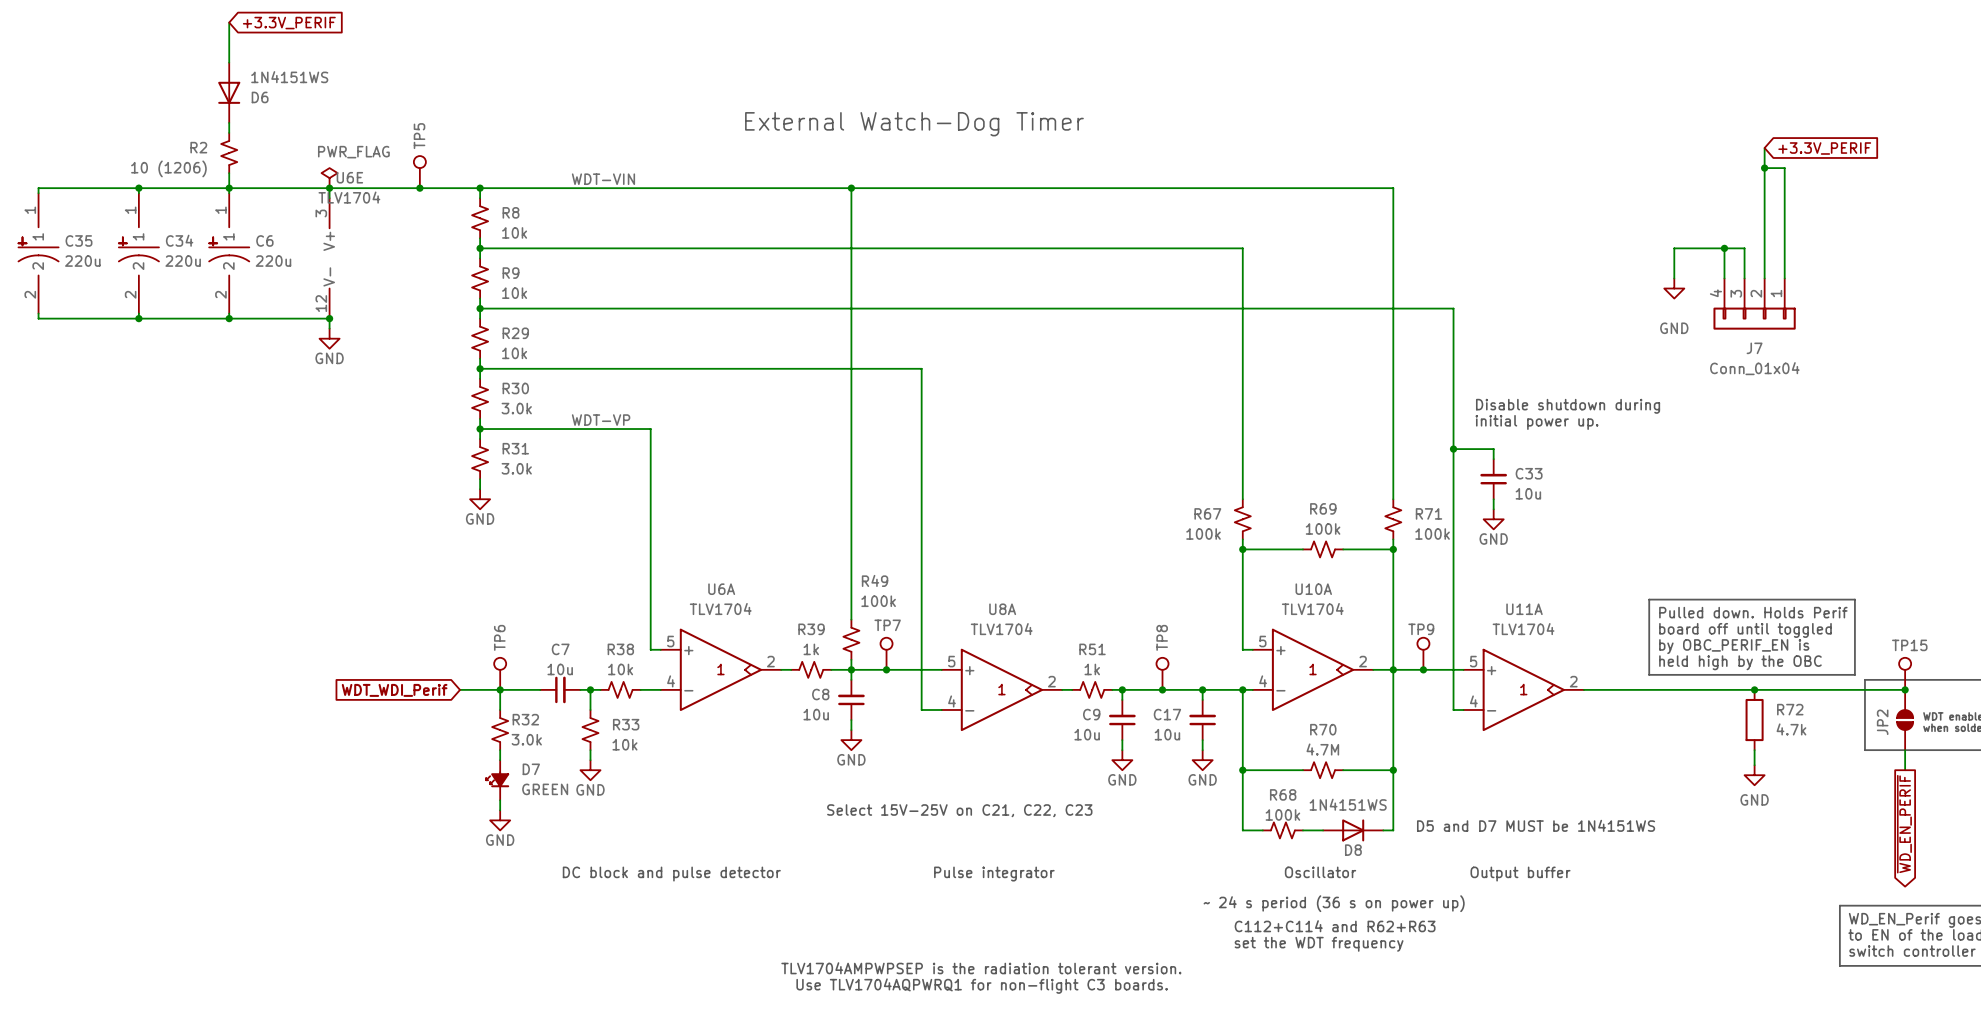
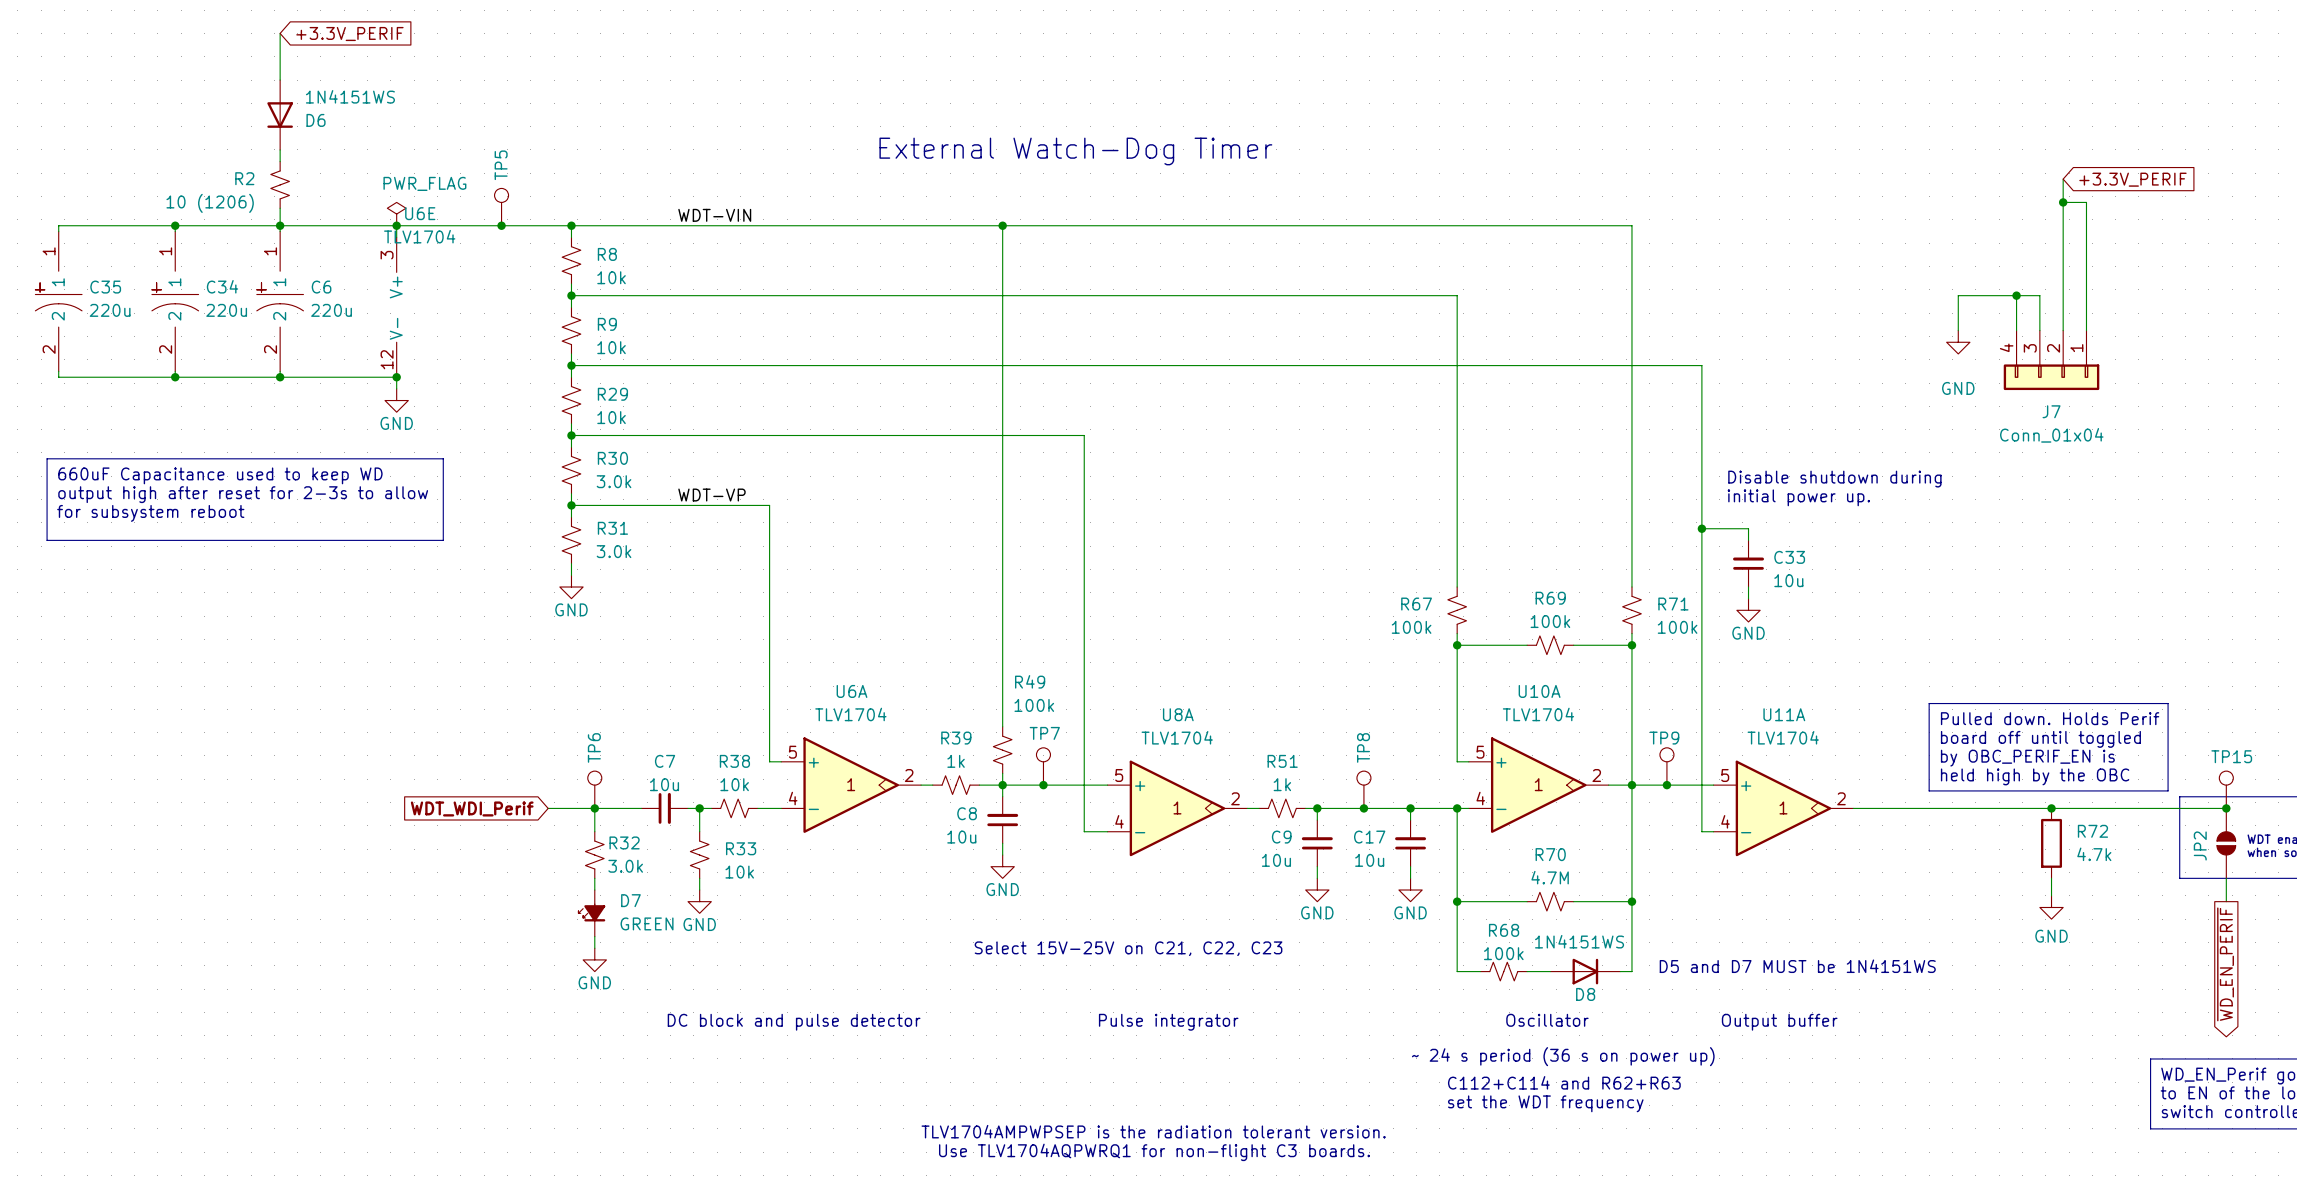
line: none -> (47, 458) (443, 458) (443, 540) (47, 540) (47, 458)
text: none -> 660uF Capacitance used to keep WD (220, 475)
text: none -> output high after reset for 2-3s to allow (243, 494)
text: none -> for subsystem reboot (150, 513)

